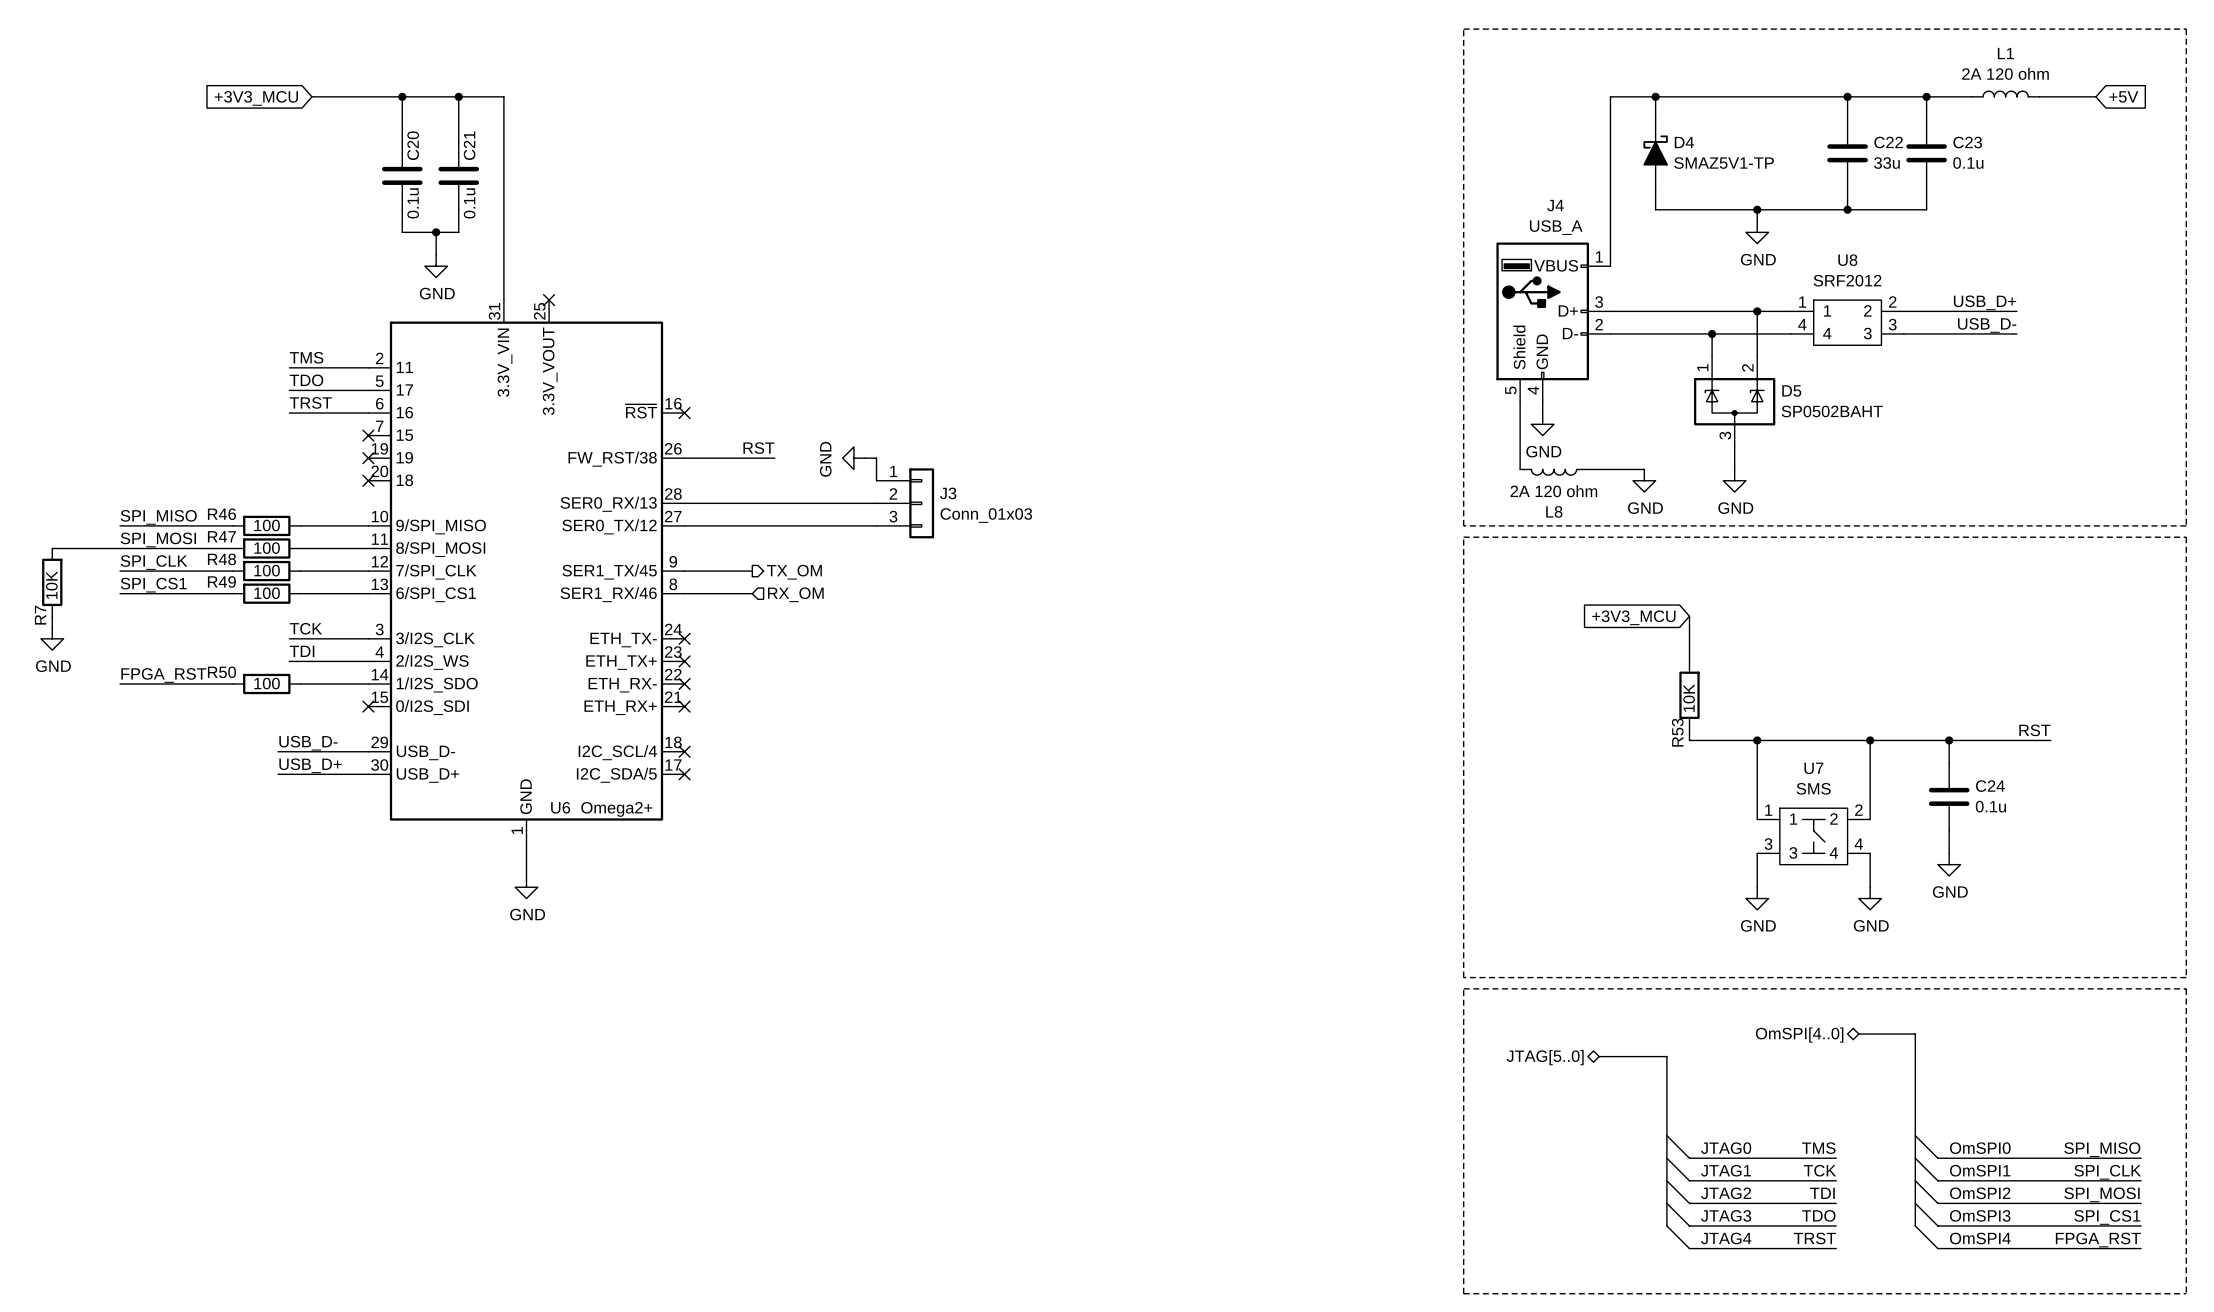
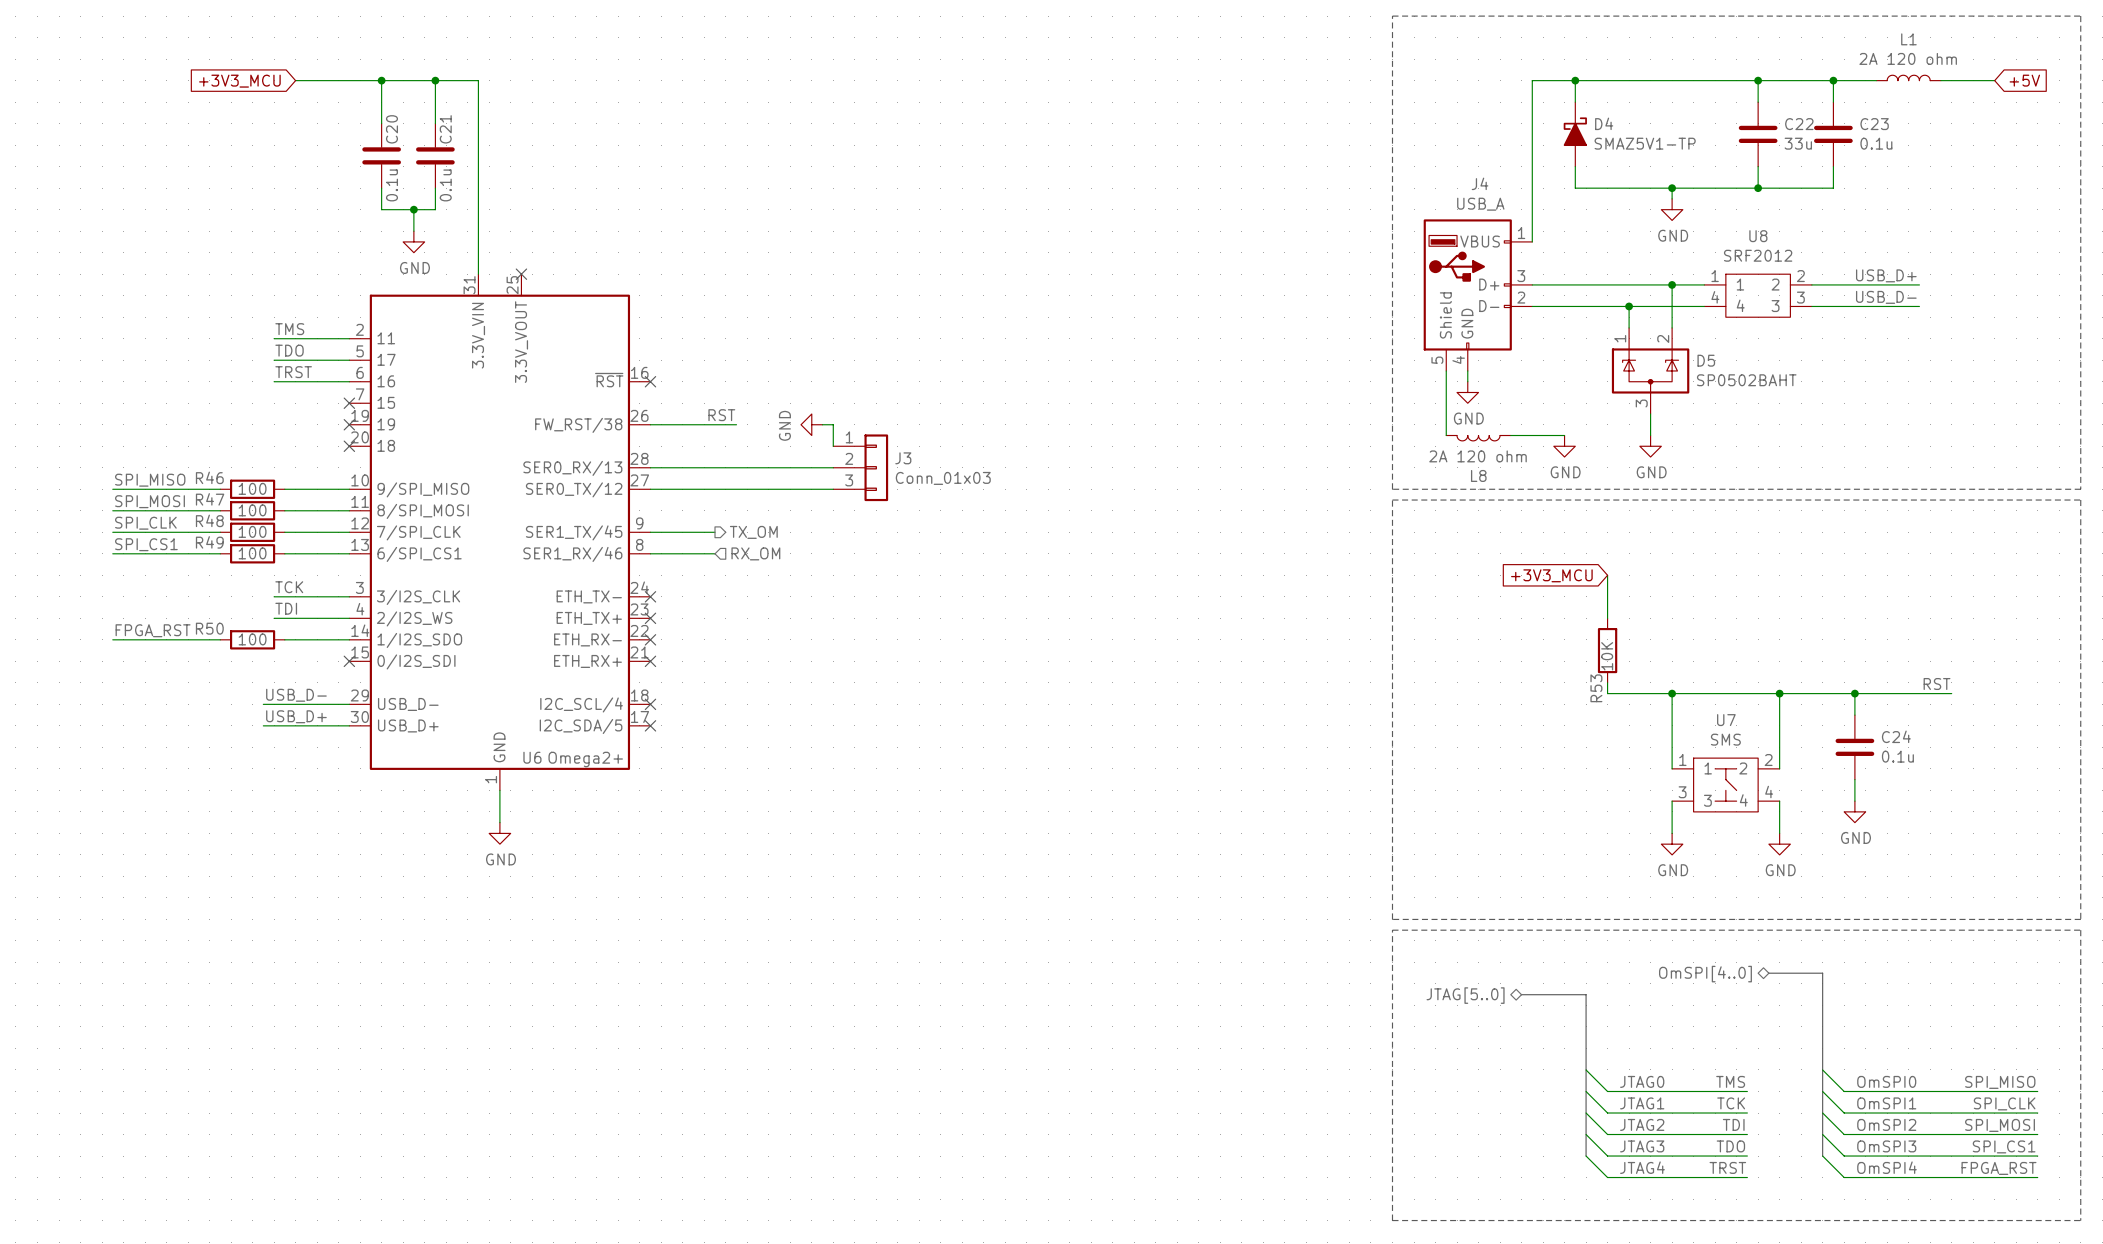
wire: (52, 548) (120, 548) -> none
R7: 10K (52, 582) -> none
wire: (52, 616) (52, 627) -> none
power symbol: GND (52, 638) -> none

